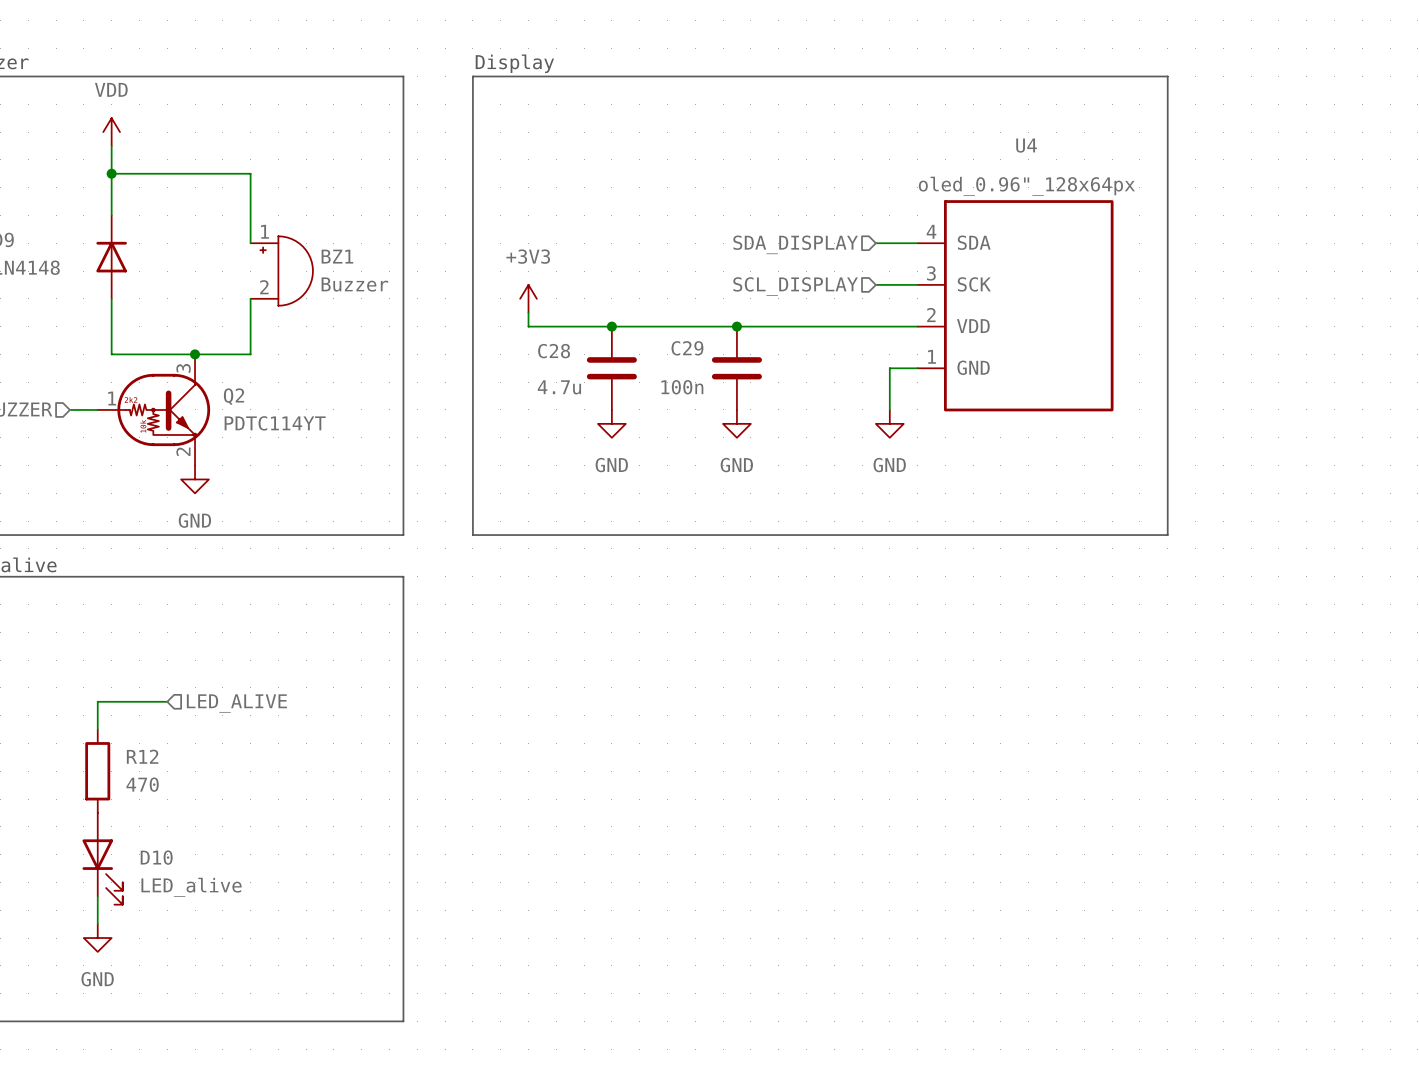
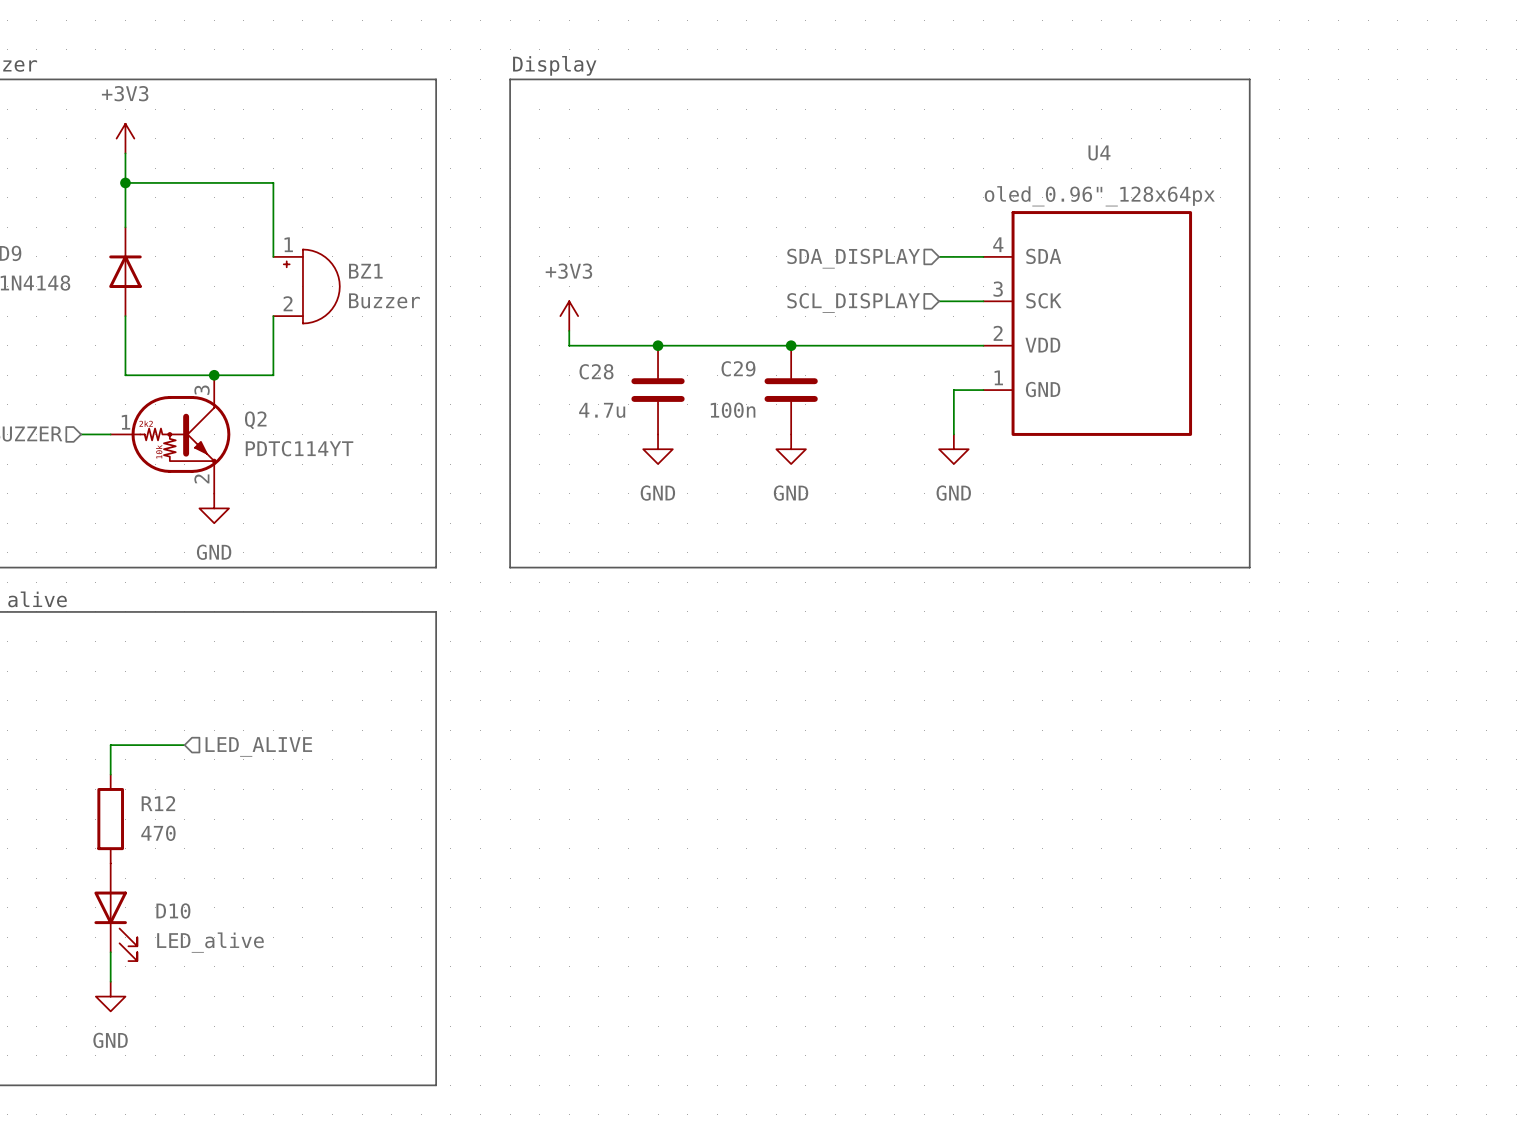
power symbol: VDD (111, 132) -> +3V3 (125, 138)

